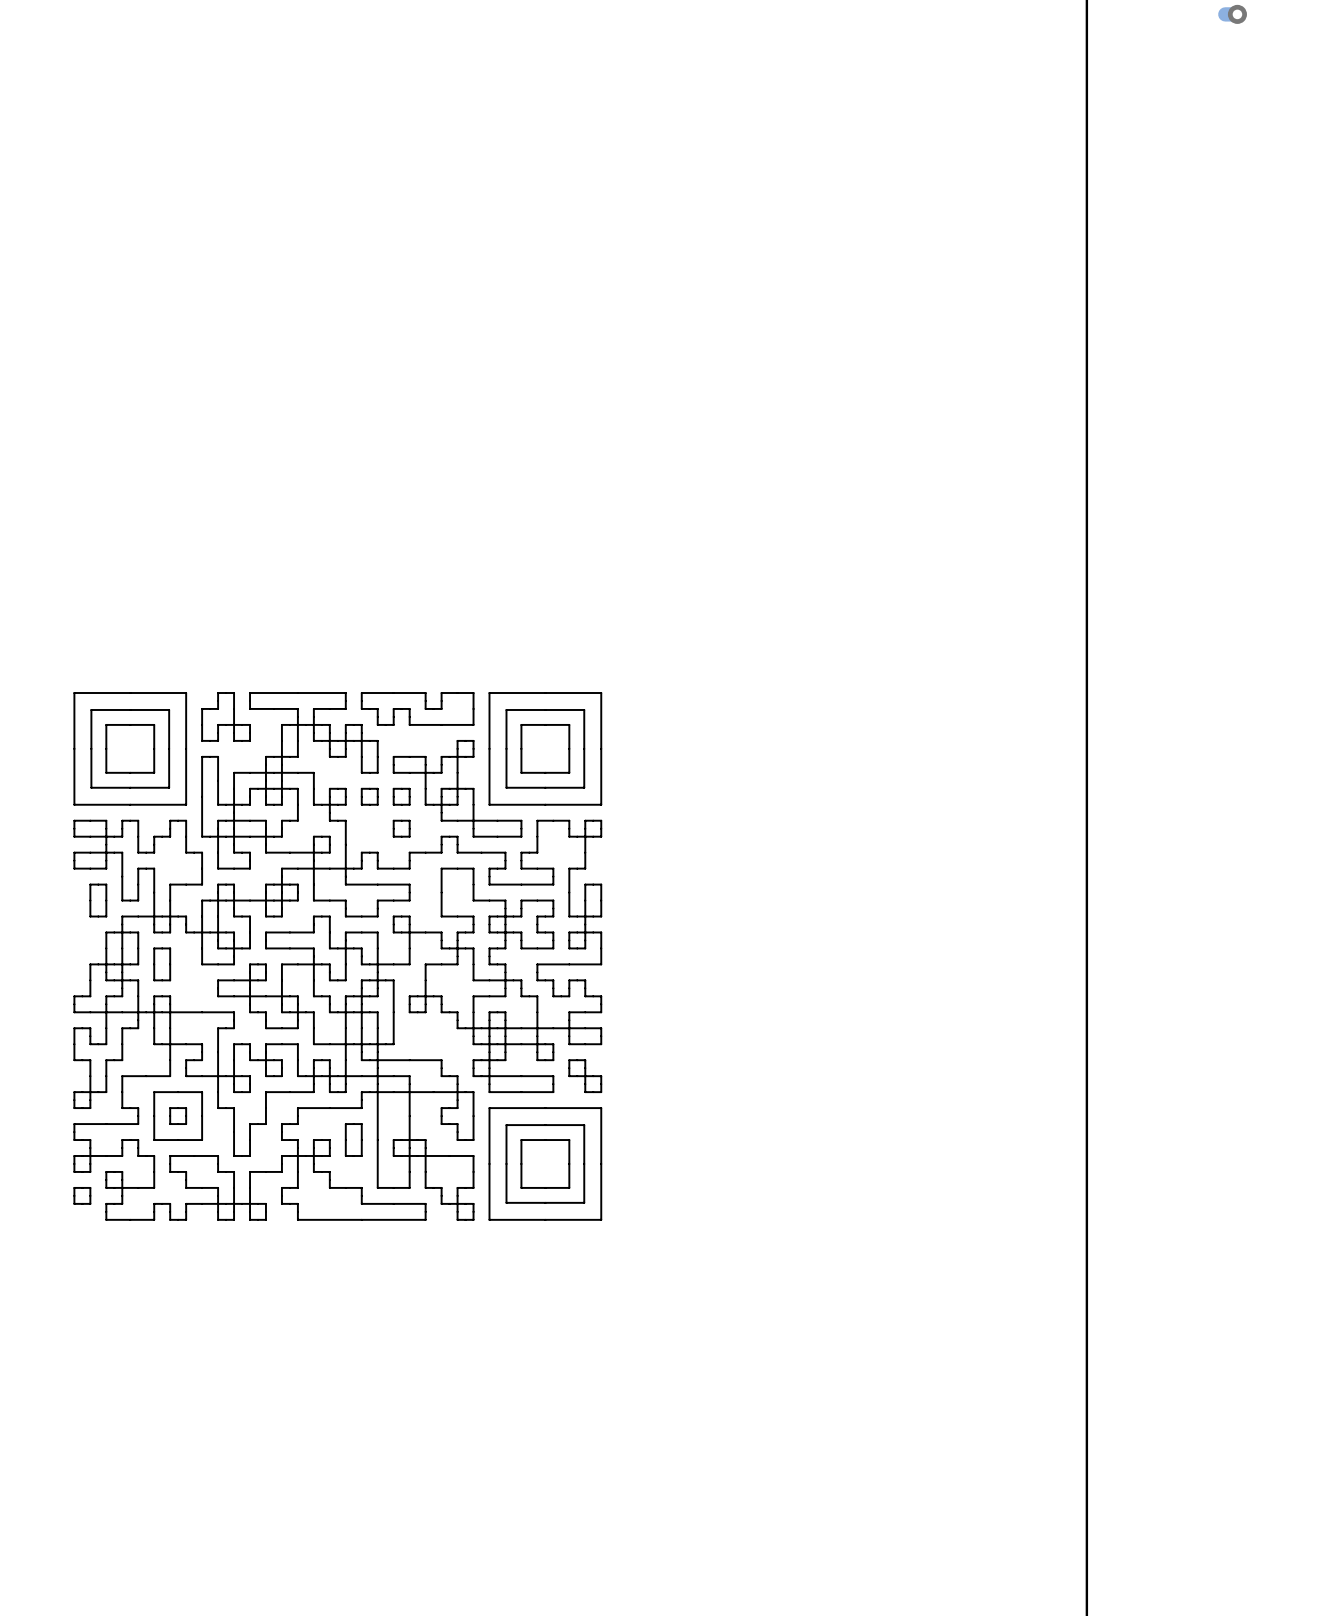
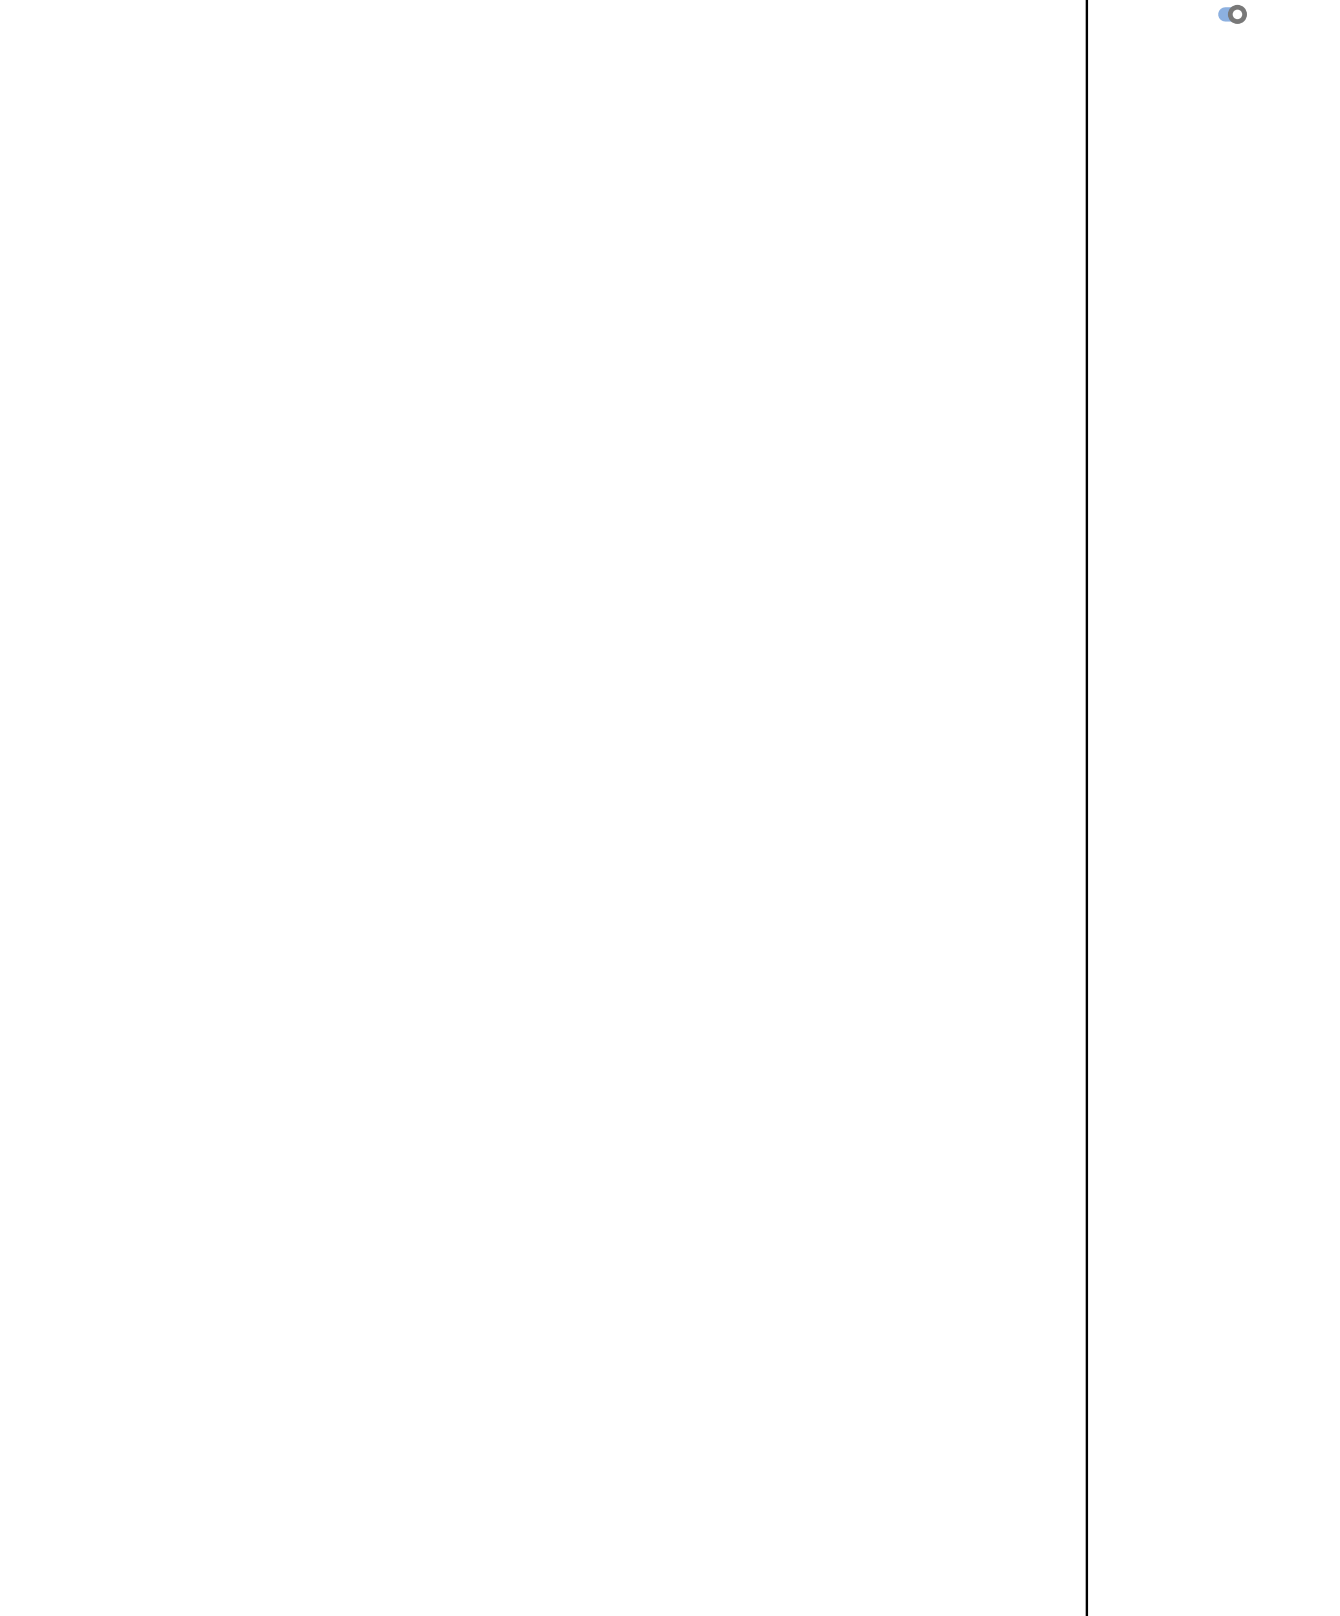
line: (186, 692) (186, 804) (74, 804) (74, 692) (186, 692) -> none
line: (234, 692) (234, 740) (250, 740) (250, 724) (218, 724) (218, 740) (202, 740) (202, 708) (218, 708) (218, 692) (234, 692) -> none
line: (345, 692) (345, 708) (313, 708) (313, 740) (377, 740) (377, 772) (361, 772) (361, 724) (345, 724) (345, 756) (329, 756) (329, 724) (281, 724) (281, 804) (265, 804) (265, 756) (297, 756) (297, 708) (250, 708) (250, 692) (345, 692) -> none
line: (473, 692) (441, 692) (441, 708) (425, 708) (425, 692) (361, 692) (361, 708) (377, 708) (377, 724) (393, 724) (393, 708) (409, 708) (409, 724) (473, 724) (473, 692) -> none
line: (601, 692) (489, 692) (489, 804) (601, 804) (601, 692) -> none
line: (169, 709) (91, 709) (91, 787) (169, 787) (169, 709) -> none
line: (584, 709) (584, 787) (506, 787) (506, 709) (584, 709) -> none
line: (154, 724) (106, 724) (106, 772) (154, 772) (154, 724) -> none
line: (569, 724) (521, 724) (521, 772) (569, 772) (569, 724) -> none
line: (473, 740) (457, 740) (457, 804) (425, 804) (425, 756) (393, 756) (393, 772) (441, 772) (441, 756) (473, 756) (473, 740) -> none
line: (218, 756) (218, 804) (250, 804) (250, 788) (297, 788) (297, 820) (281, 820) (281, 836) (202, 836) (202, 756) (218, 756) -> none
line: (313, 772) (313, 804) (345, 804) (345, 788) (329, 788) (329, 820) (345, 820) (345, 884) (409, 884) (409, 900) (377, 900) (377, 916) (345, 916) (345, 900) (313, 900) (313, 836) (329, 836) (329, 852) (265, 852) (265, 820) (218, 820) (218, 868) (250, 868) (250, 852) (234, 852) (234, 772) (313, 772) -> none
line: (377, 788) (377, 804) (361, 804) (361, 788) (377, 788) -> none
line: (409, 788) (393, 788) (393, 804) (409, 804) (409, 788) -> none
line: (473, 788) (441, 788) (441, 820) (521, 820) (521, 836) (473, 836) (473, 788) -> none
line: (186, 820) (186, 852) (202, 852) (202, 884) (170, 884) (170, 932) (154, 932) (154, 868) (138, 868) (138, 900) (122, 900) (122, 852) (74, 852) (74, 868) (106, 868) (106, 820) (74, 820) (74, 836) (122, 836) (122, 820) (138, 820) (138, 852) (154, 852) (154, 836) (170, 836) (170, 820) (186, 820) -> none
line: (409, 820) (393, 820) (393, 836) (409, 836) (409, 820) -> none
line: (601, 820) (585, 820) (585, 868) (569, 868) (569, 916) (601, 916) (601, 884) (585, 884) (585, 948) (569, 948) (569, 932) (601, 932) (601, 964) (537, 964) (537, 980) (553, 980) (553, 996) (569, 996) (569, 980) (585, 980) (585, 996) (601, 996) (601, 1012) (569, 1012) (569, 1044) (601, 1044) (601, 1028) (457, 1028) (457, 1012) (441, 1012) (441, 996) (409, 996) (409, 1012) (425, 1012) (425, 964) (457, 964) (457, 932) (473, 932) (473, 916) (441, 916) (441, 868) (473, 868) (473, 900) (505, 900) (505, 948) (489, 948) (489, 964) (505, 964) (505, 996) (473, 996) (473, 1044) (553, 1044) (553, 1060) (537, 1060) (537, 996) (521, 996) (521, 980) (473, 980) (473, 948) (441, 948) (441, 932) (393, 932) (393, 916) (409, 916) (409, 964) (361, 964) (361, 948) (329, 948) (329, 916) (313, 916) (313, 932) (265, 932) (265, 948) (313, 948) (313, 996) (329, 996) (329, 1012) (377, 1012) (377, 1187) (409, 1187) (409, 1076) (297, 1076) (297, 1044) (265, 1044) (265, 1076) (281, 1076) (281, 1060) (250, 1060) (250, 1044) (234, 1044) (234, 1092) (250, 1092) (250, 1076) (186, 1076) (186, 1060) (202, 1060) (202, 1044) (154, 1044) (154, 996) (170, 996) (170, 1076) (122, 1076) (122, 1108) (138, 1108) (138, 1124) (74, 1124) (74, 1140) (90, 1140) (90, 1171) (74, 1171) (74, 1155) (122, 1155) (122, 1140) (138, 1140) (138, 1155) (154, 1155) (154, 1187) (106, 1187) (106, 1171) (122, 1171) (122, 1203) (106, 1203) (106, 1219) (154, 1219) (154, 1203) (170, 1203) (170, 1219) (186, 1219) (186, 1203) (265, 1203) (265, 1219) (250, 1219) (250, 1171) (281, 1171) (281, 1155) (329, 1155) (329, 1140) (313, 1140) (313, 1171) (329, 1171) (329, 1187) (361, 1187) (361, 1203) (425, 1203) (425, 1219) (297, 1219) (297, 1203) (281, 1203) (281, 1187) (297, 1187) (297, 1140) (281, 1140) (281, 1124) (297, 1124) (297, 1108) (361, 1108) (361, 1092) (473, 1092) (473, 1140) (457, 1140) (457, 1124) (441, 1124) (441, 1108) (457, 1108) (457, 1076) (441, 1076) (441, 1060) (361, 1060) (361, 980) (393, 980) (393, 1044) (313, 1044) (313, 1012) (281, 1012) (281, 964) (329, 964) (329, 980) (345, 980) (345, 932) (377, 932) (377, 996) (345, 996) (345, 1092) (329, 1092) (329, 1060) (313, 1060) (313, 1092) (265, 1092) (265, 1124) (250, 1124) (250, 1155) (234, 1155) (234, 1108) (218, 1108) (218, 1028) (234, 1028) (234, 1012) (74, 1012) (74, 996) (90, 996) (90, 964) (138, 964) (138, 932) (106, 932) (106, 980) (138, 980) (138, 1028) (122, 1028) (122, 1060) (106, 1060) (106, 1092) (74, 1092) (74, 1108) (90, 1108) (90, 1060) (74, 1060) (74, 1028) (90, 1028) (90, 1044) (106, 1044) (106, 996) (122, 996) (122, 916) (186, 916) (186, 932) (234, 932) (234, 964) (202, 964) (202, 900) (297, 900) (297, 884) (265, 884) (265, 916) (281, 916) (281, 868) (361, 868) (361, 852) (377, 852) (377, 868) (409, 868) (409, 852) (441, 852) (441, 836) (457, 836) (457, 852) (505, 852) (505, 868) (489, 868) (489, 884) (553, 884) (553, 868) (521, 868) (521, 852) (537, 852) (537, 820) (569, 820) (569, 836) (601, 836) (601, 820) -> none
line: (106, 884) (106, 916) (90, 916) (90, 884) (106, 884) -> none
line: (234, 884) (234, 916) (250, 916) (250, 948) (218, 948) (218, 884) (234, 884) -> none
line: (553, 900) (553, 916) (537, 916) (537, 932) (553, 932) (553, 948) (521, 948) (521, 932) (489, 932) (489, 916) (521, 916) (521, 900) (553, 900) -> none
line: (170, 948) (170, 980) (154, 980) (154, 948) (170, 948) -> none
line: (265, 964) (250, 964) (250, 1012) (265, 1012) (265, 1028) (297, 1028) (297, 996) (218, 996) (218, 980) (265, 980) (265, 964) -> none
line: (505, 1012) (489, 1012) (489, 1092) (553, 1092) (553, 1076) (473, 1076) (473, 1060) (505, 1060) (505, 1012) -> none
line: (585, 1060) (569, 1060) (569, 1076) (601, 1076) (601, 1092) (585, 1092) (585, 1060) -> none
line: (202, 1092) (154, 1092) (154, 1140) (202, 1140) (202, 1092) -> none
line: (186, 1108) (186, 1124) (170, 1124) (170, 1108) (186, 1108) -> none
line: (601, 1108) (489, 1108) (489, 1219) (601, 1219) (601, 1108) -> none
line: (361, 1124) (345, 1124) (345, 1155) (361, 1155) (361, 1124) -> none
line: (584, 1125) (584, 1202) (506, 1202) (506, 1125) (584, 1125) -> none
line: (425, 1140) (393, 1140) (393, 1155) (473, 1155) (473, 1187) (457, 1187) (457, 1219) (473, 1219) (473, 1203) (441, 1203) (441, 1187) (425, 1187) (425, 1140) -> none
line: (569, 1140) (521, 1140) (521, 1187) (569, 1187) (569, 1140) -> none
line: (218, 1155) (218, 1171) (234, 1171) (234, 1219) (218, 1219) (218, 1187) (186, 1187) (186, 1171) (170, 1171) (170, 1155) (218, 1155) -> none
line: (90, 1187) (74, 1187) (74, 1203) (90, 1203) (90, 1187) -> none

